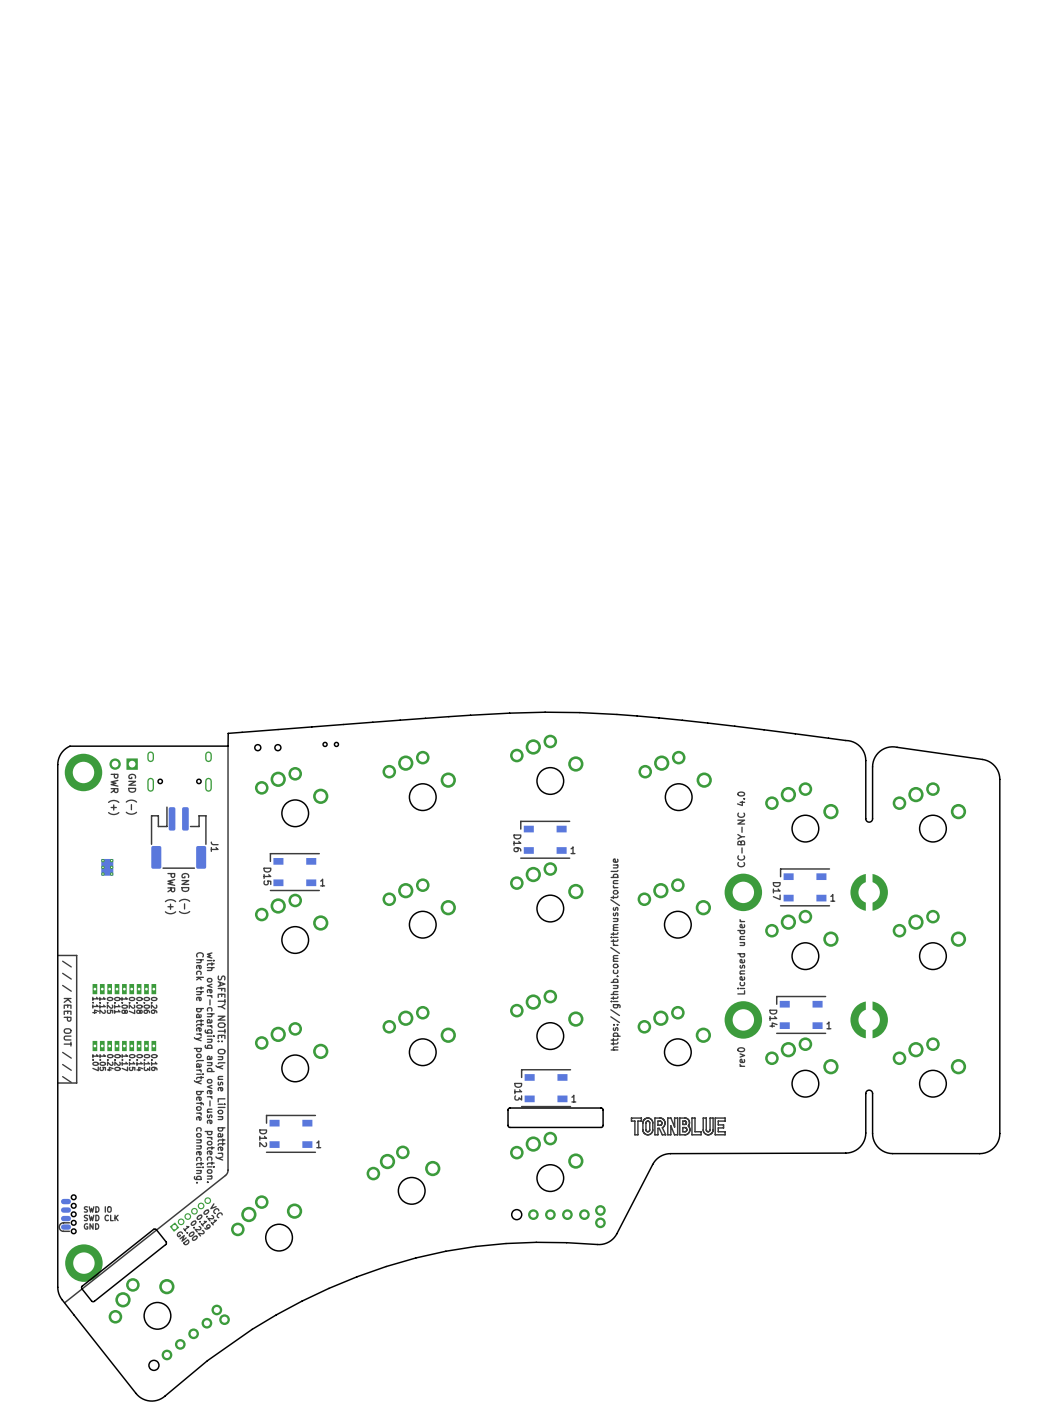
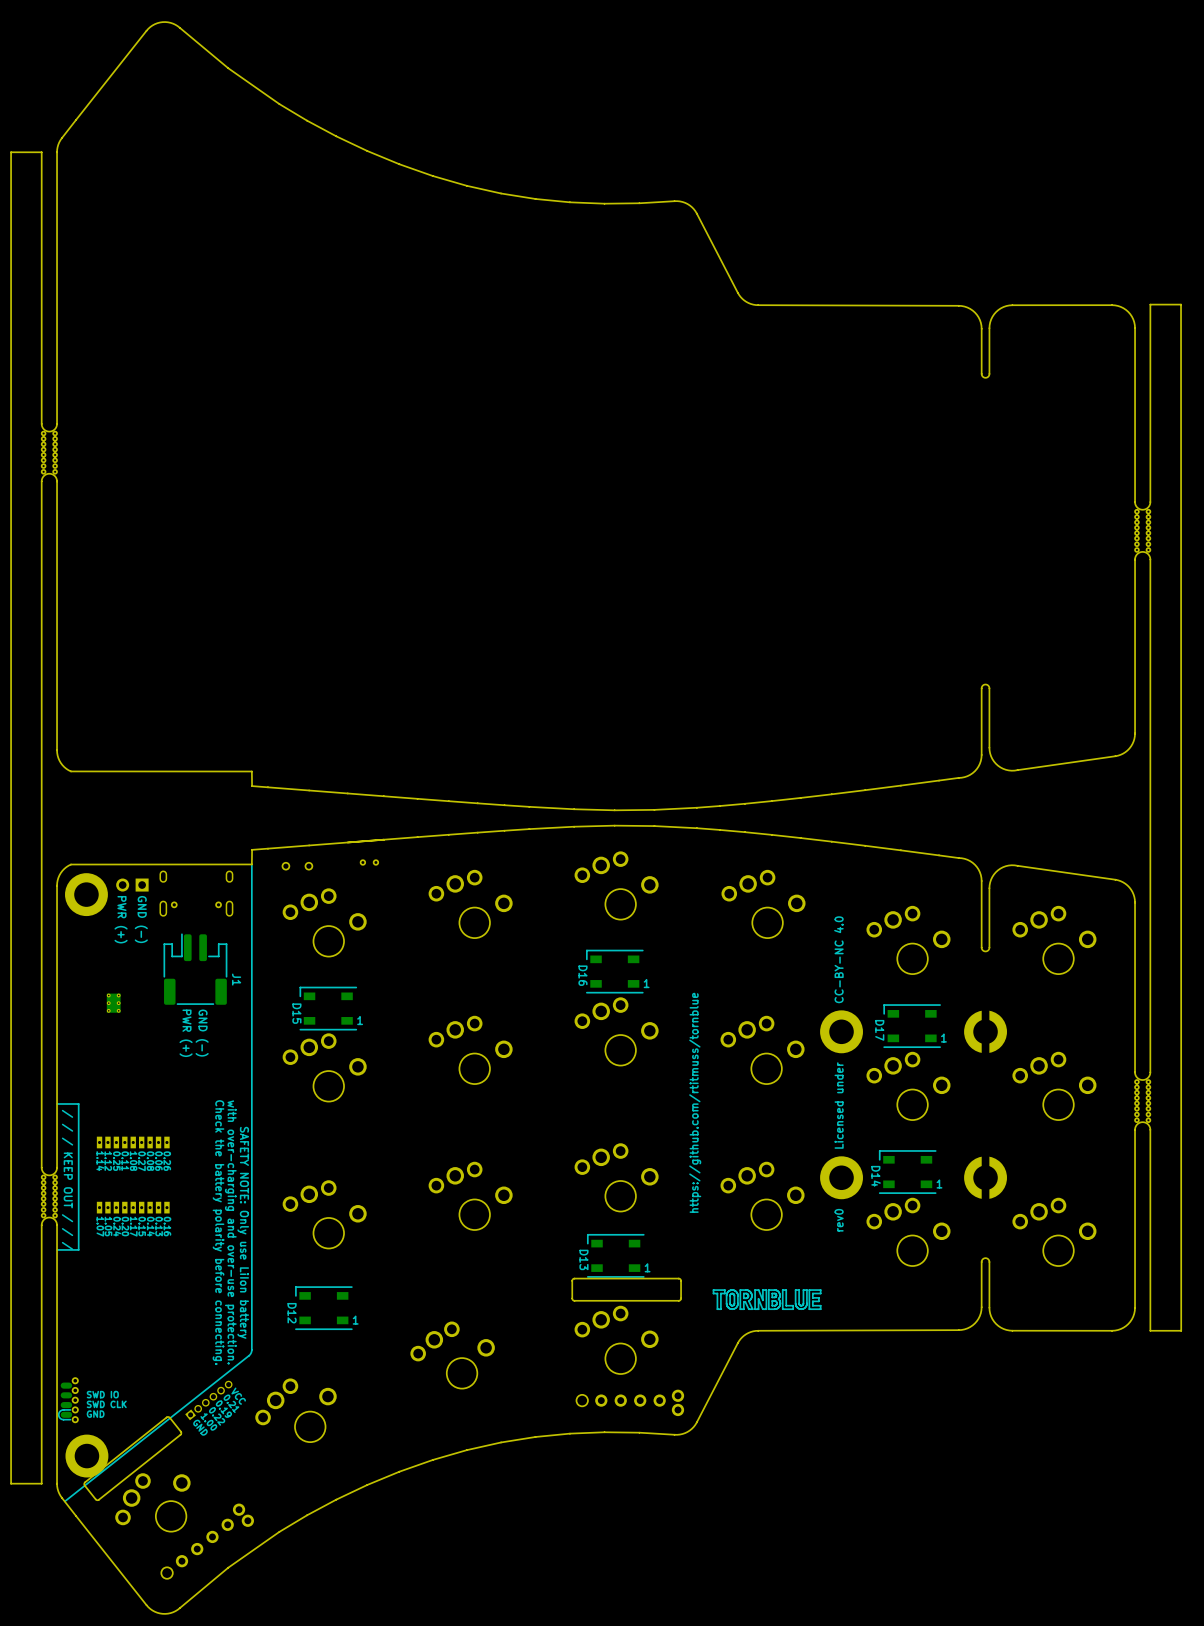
board edge: none -> (41, 423) (41, 152) (11, 152) (11, 1483) (41, 1483) (41, 1225)
board edge: none -> (57, 423) (57, 147) (61, 138) (146, 30) (154, 24) (165, 22) (177, 26) (228, 68) (279, 104) (307, 120) (367, 150) (432, 176) (501, 193) (535, 198) (604, 203) (677, 201) (687, 203) (696, 213) (739, 294) (750, 303) (958, 305) (967, 307) (974, 312) (980, 322) (981, 374) (984, 377) (989, 374) (990, 322) (994, 314) (1000, 308) (1012, 305) (1112, 305) (1123, 308) (1131, 316) (1135, 328) (1135, 502)
part: none -> (49, 452)
board edge: none -> (41, 481) (41, 1167)
board edge: none -> (57, 481) (57, 750) (59, 760) (66, 768) (70, 771) (251, 771) (252, 786) (477, 803) (614, 810) (696, 807) (800, 797) (964, 777) (974, 771) (980, 760) (981, 688) (985, 684) (989, 687) (990, 753) (994, 761) (1003, 768) (1014, 770) (1120, 754) (1129, 748) (1134, 736) (1135, 559)
board edge: none -> (1150, 502) (1150, 304) (1181, 304) (1181, 1330) (1150, 1330) (1150, 1129)
part: none -> (1142, 530)
board edge: none -> (1150, 559) (1150, 1072)
board edge: (999, 927) (999, 978) -> none
part: none -> (1142, 1101)
board edge: (57, 1011) (57, 1061) -> none
part: none -> (49, 1196)

